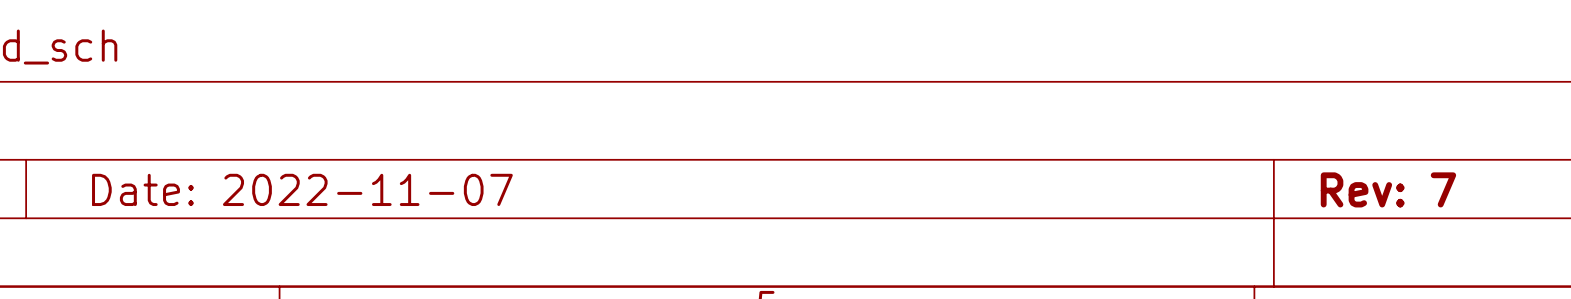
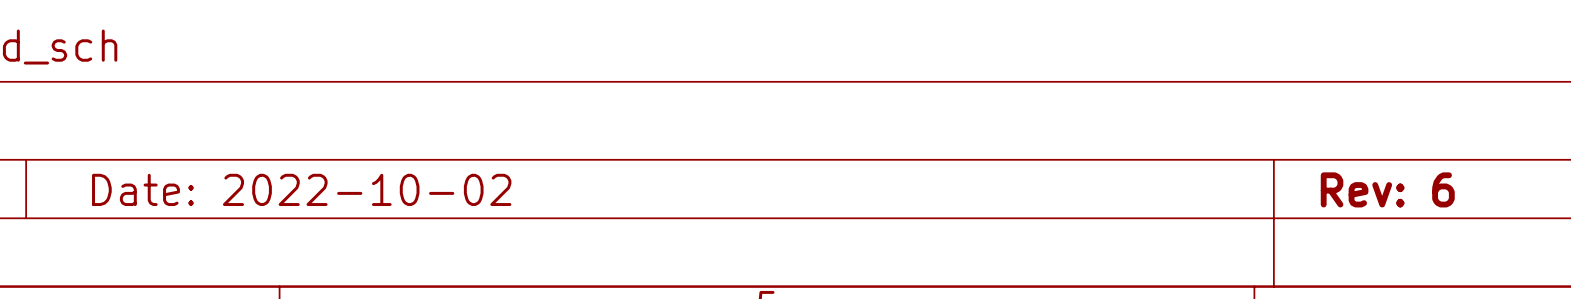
title block: Date: 2022-11-07 (302, 189) -> Date: 2022-10-02 (301, 189)
title block: Rev: 7 (1388, 189) -> Rev: 6 (1387, 189)

